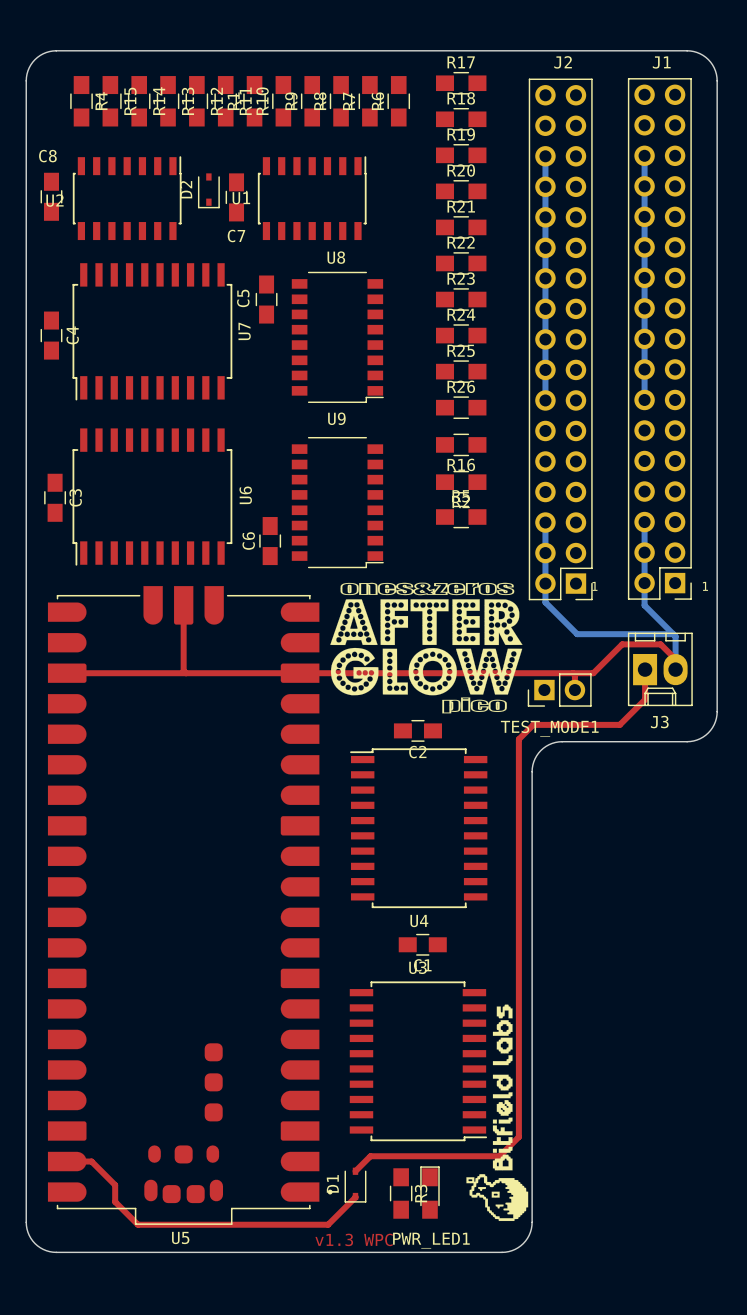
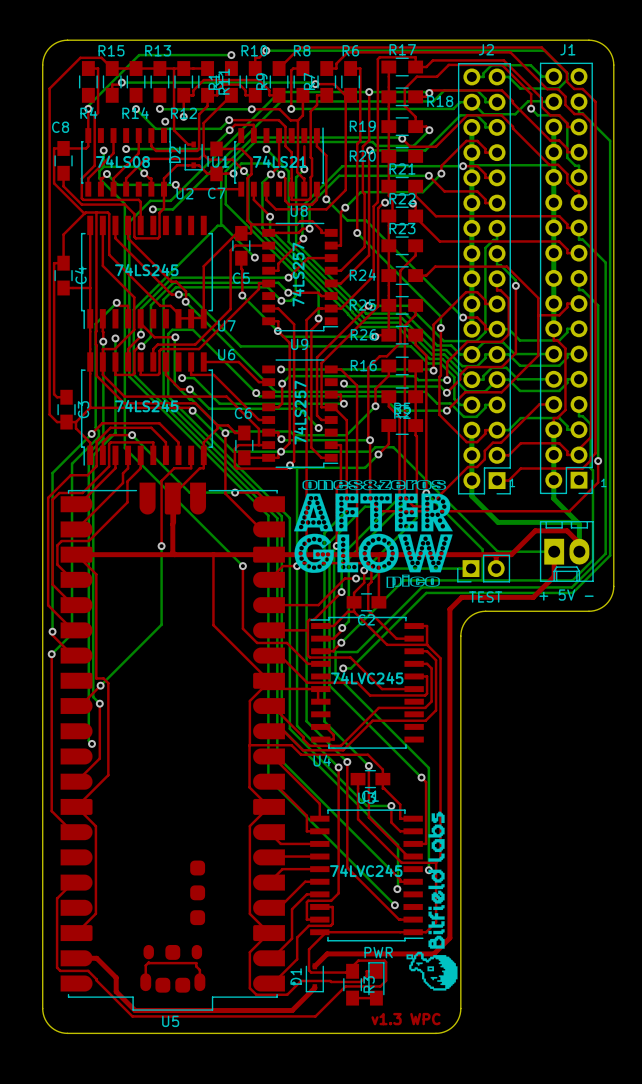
top track: none -> (266, 50) (259, 57) (255, 57) (255, 68)
bottom track: none -> (266, 50) (544, 50) (567, 73) (567, 79) (558, 88) (520, 88) (508, 76) (497, 76)
via: none -> (266, 50)
bottom track: none -> (231, 55) (139, 55) (88, 105) (88, 108)
via: none -> (231, 55)
top track: none -> (388, 67) (388, 195) (392, 199) (392, 212) (388, 216) (388, 335) (375, 336)
top track: none -> (88, 68) (98, 68) (98, 113) (94, 116) (94, 165) (81, 178) (81, 198) (83, 199) (138, 199) (140, 201) (140, 225)
top track: none -> (174, 68) (174, 130) (188, 144) (193, 144)
top track: none -> (207, 68) (112, 68) (101, 57) (80, 57) (49, 88) (49, 414) (57, 422) (75, 422)
top track: none -> (279, 68) (300, 47) (541, 47) (566, 72) (566, 81) (574, 88) (582, 88) (595, 101) (595, 453) (582, 468) (520, 468) (508, 480) (497, 480)
top track: none -> (302, 68) (293, 68) (291, 70) (291, 108)
top track: none -> (326, 68) (336, 68) (336, 63) (347, 52) (510, 52) (547, 89) (558, 89) (565, 96) (565, 104) (574, 114) (582, 114) (591, 122) (591, 437) (573, 454)
top track: none -> (350, 68) (360, 68) (360, 140) (357, 143) (357, 233)
bottom track: none -> (553, 76) (542, 76) (530, 65) (491, 65) (483, 73) (483, 76) (471, 76)
R18 name position: R18 (461, 98) -> R18 (440, 101)
R4 name rotation: 0° (101, 101) -> 90° clockwise (88, 113)
R4 name position: R4 (101, 101) -> R4 (88, 113)
R15 name rotation: 0° (130, 101) -> 90° clockwise (111, 50)
R15 name position: R15 (130, 101) -> R15 (111, 50)
R14 name rotation: 0° (159, 101) -> 90° clockwise (135, 113)
R14 name position: R14 (159, 101) -> R14 (135, 113)
R13 name rotation: 0° (188, 101) -> 90° clockwise (158, 50)
R13 name position: R13 (188, 101) -> R13 (158, 50)
R12 name rotation: 0° (216, 101) -> 90° clockwise (183, 113)
R12 name position: R12 (216, 101) -> R12 (183, 113)
R10 name rotation: 0° (262, 101) -> 90° clockwise (254, 50)
R8 name rotation: 0° (320, 101) -> 90° clockwise (302, 50)
R8 name position: R8 (320, 101) -> R8 (302, 50)
R6 name rotation: 0° (377, 101) -> 90° clockwise (350, 50)
R6 name position: R6 (377, 101) -> R6 (350, 50)
top track: none -> (121, 82) (119, 84) (112, 84) (112, 95)
bottom track: none -> (121, 82) (313, 82) (315, 84)
via: none -> (121, 82)
top track: none -> (315, 84) (334, 84) (345, 95)
via: none -> (315, 84)
top track: none -> (369, 92) (369, 140) (362, 146) (364, 247) (340, 270) (331, 270)
via: none -> (369, 92)
bottom track: none -> (429, 93) (279, 92) (170, 200) (150, 200) (129, 221) (129, 376) (268, 515) (268, 778) (394, 905)
via: none -> (429, 93)
top track: none -> (231, 95) (203, 123) (203, 154)
top track: none -> (255, 95) (245, 95) (245, 90) (239, 84) (223, 84) (217, 90) (217, 95) (207, 95) (207, 106) (199, 114) (199, 148) (197, 150) (156, 150) (151, 146) (151, 135)
top track: none -> (279, 95) (269, 95) (269, 90) (258, 80) (203, 80) (193, 90) (193, 95) (183, 95) (183, 116)
top track: none -> (302, 95) (302, 115) (297, 120)
top track: none -> (326, 95) (317, 95) (317, 105) (310, 111) (312, 176) (309, 199) (291, 199) (291, 152) (285, 146) (285, 126) (278, 120) (229, 120)
top track: none -> (350, 95) (345, 95) (345, 190) (326, 209) (275, 209) (266, 199) (266, 189)
top track: none -> (415, 96) (426, 96) (431, 90) (501, 90) (550, 140) (559, 140) (567, 148) (567, 152) (579, 152)
bottom track: none -> (497, 102) (485, 102) (485, 98) (477, 90) (444, 90) (433, 101) (280, 101) (172, 209) (152, 209)
bottom track: none -> (553, 101) (528, 101) (515, 114) (483, 114) (471, 102) (460, 102) (453, 108) (291, 108)
bottom track: none -> (579, 101) (579, 113) (582, 113) (610, 140) (610, 555) (572, 592) (426, 592) (350, 668) (343, 668)
top track: none -> (88, 106) (88, 146) (86, 148) (54, 148) (54, 183) (84, 213)
via: none -> (88, 108)
bottom track: none -> (159, 108) (251, 109)
via: none -> (159, 108)
via: none -> (291, 108)
top track: none -> (531, 108) (531, 94) (501, 64) (448, 64) (437, 76) (416, 76) (404, 88) (404, 106) (415, 116) (415, 126) (426, 126) (429, 130)
bottom track: none -> (531, 108) (537, 115) (559, 115) (567, 123) (567, 157) (575, 165) (579, 165) (579, 177)
via: none -> (531, 108)
bottom track: none -> (136, 109) (155, 128) (220, 128) (229, 120)
via: none -> (136, 109)
top track: none -> (251, 109) (279, 109) (290, 120) (297, 120)
via: none -> (251, 109)
R19 name position: R19 (461, 134) -> R19 (362, 126)
via: none -> (183, 116)
via: none -> (229, 120)
top track: none -> (297, 120) (297, 172) (304, 178) (304, 189)
via: none -> (165, 121)
top track: none -> (579, 127) (567, 127) (567, 123) (559, 115) (550, 115) (541, 106) (541, 98) (503, 60) (432, 60) (426, 67) (415, 67) (415, 57) (379, 57) (377, 59) (377, 202) (373, 206) (373, 275) (340, 308) (318, 308) (306, 320) (306, 546)
bottom track: none -> (497, 127) (485, 127) (485, 123) (476, 115) (460, 115) (425, 150) (370, 150)
top track: none -> (229, 130) (235, 124) (253, 124) (253, 135)
bottom track: none -> (229, 130) (210, 149) (126, 149)
via: none -> (229, 130)
bottom track: none -> (429, 130) (413, 145) (376, 145) (372, 142) (254, 142) (225, 171) (225, 204) (295, 274) (295, 295) (290, 300) (281, 300) (267, 287) (175, 287) (163, 299) (163, 398) (281, 516) (281, 728) (398, 844) (397, 889)
via: none -> (429, 130)
top track: none -> (113, 135) (113, 153) (88, 178) (88, 189)
top track: none -> (138, 135) (138, 153) (113, 178) (113, 189)
top track: none -> (279, 135) (279, 166) (270, 174)
top track: none -> (316, 135) (316, 146) (326, 155) (326, 199)
top track: none -> (402, 138) (410, 146) (435, 146) (467, 115) (501, 115) (549, 164) (558, 164) (567, 174) (567, 182) (575, 191) (579, 191) (579, 202)
bottom track: none -> (402, 138) (253, 137) (221, 169) (221, 225)
via: none -> (402, 138)
R20 name position: R20 (461, 170) -> R20 (362, 156)
top track: none -> (304, 146) (304, 169)
via: none -> (126, 149)
top track: none -> (216, 148) (241, 148) (251, 159) (251, 174) (247, 178) (247, 220) (251, 224)
bottom track: none -> (266, 149) (288, 171) (288, 241) (364, 318) (401, 318) (433, 350) (446, 350) (462, 366) (477, 366) (485, 358) (485, 354) (508, 354) (520, 365) (559, 365) (567, 357) (567, 354) (579, 354)
via: none -> (266, 149)
bottom track: none -> (103, 150) (103, 166)
via: none -> (103, 150)
top track: none -> (370, 150) (369, 255) (340, 283) (331, 283)
via: none -> (370, 150)
top track: none -> (497, 152) (485, 152) (485, 148) (477, 140) (466, 140) (441, 165) (441, 173)
top track: none -> (203, 154) (208, 159) (232, 159) (243, 171)
top track: none -> (203, 154) (199, 158) (145, 158) (126, 178) (126, 189)
text: none -> 74LS08 (122, 161)
text: none -> 74LS21 (279, 161)
U2 name position: U2 (54, 200) -> U2 (184, 193)
bottom track: none -> (471, 165) (553, 165)
top track: none -> (463, 166) (477, 166) (485, 174) (485, 177) (497, 177)
bottom track: none -> (463, 166) (342, 166) (302, 206) (303, 238)
via: none -> (463, 166)
bottom track: none -> (103, 166) (137, 166) (144, 173)
bottom track: none -> (103, 166) (99, 171) (99, 178) (124, 203) (124, 448) (242, 566)
bottom track: none -> (304, 169) (296, 177) (296, 242) (366, 313) (405, 313) (437, 345) (451, 345) (460, 354) (471, 354) (483, 342) (503, 342) (514, 354) (553, 354)
via: none -> (304, 169)
bottom track: none -> (243, 171) (248, 175) (248, 220) (318, 290) (318, 318)
via: none -> (243, 171)
top track: none -> (63, 173) (63, 186) (81, 204) (124, 204) (134, 214) (135, 238) (159, 236) (159, 212) (163, 208) (163, 178) (177, 165) (199, 165) (207, 173) (233, 173)
top track: none -> (144, 173) (151, 178) (151, 189)
via: none -> (144, 173)
top track: none -> (106, 174) (100, 178) (100, 189)
bottom track: none -> (106, 174) (117, 184) (175, 184)
via: none -> (106, 174)
bottom track: none -> (233, 173) (241, 163) (270, 163) (281, 174)
via: none -> (233, 173)
bottom track: none -> (441, 173) (422, 192) (360, 192) (345, 207)
via: none -> (441, 173)
bottom track: none -> (270, 174) (262, 182) (262, 228) (360, 327) (397, 327) (429, 358) (442, 358) (458, 375) (458, 383) (466, 391) (485, 391) (497, 379) (508, 379) (520, 390) (559, 390) (567, 382) (567, 379) (579, 379)
via: none -> (270, 174)
top track: none -> (281, 174) (285, 178) (285, 200) (288, 204) (312, 204) (316, 199) (316, 189)
via: none -> (281, 174)
top track: none -> (428, 175) (444, 191) (477, 191) (485, 199) (485, 203) (497, 203)
bottom track: none -> (428, 175) (339, 175) (309, 205) (309, 228)
via: none -> (428, 175)
top track: none -> (175, 184) (180, 189) (241, 189)
via: none -> (175, 184)
top track: none -> (415, 186) (415, 195) (435, 216) (559, 216) (567, 224) (567, 227) (579, 227)
top track: none -> (253, 189) (253, 199) (270, 216)
bottom track: none -> (326, 199) (347, 220) (365, 220) (463, 317)
via: none -> (326, 199)
top track: none -> (385, 202) (378, 208) (378, 306) (321, 363) (321, 407) (333, 407) (346, 420) (346, 510)
via: none -> (385, 202)
top track: none -> (412, 203) (415, 206) (415, 217) (439, 241) (559, 241) (567, 249) (567, 253) (579, 253)
via: none -> (412, 203)
top track: none -> (345, 207) (340, 212) (340, 245) (331, 245)
via: none -> (345, 207)
via: none -> (152, 209)
top track: none -> (96, 212) (96, 375) (124, 403) (195, 403) (217, 425) (217, 428) (203, 442) (203, 468) (199, 468) (174, 493) (174, 522) (172, 524)
bottom track: none -> (270, 216) (270, 229) (362, 322) (400, 322) (432, 354) (444, 354) (469, 379) (483, 379) (483, 376) (491, 367) (506, 367) (517, 379) (553, 379)
via: none -> (270, 216)
top track: none -> (251, 224) (250, 233) (236, 233) (203, 266) (203, 318)
top track: none -> (251, 224) (297, 224) (300, 221) (312, 221) (321, 232) (331, 232)
top track: none -> (90, 225) (90, 407)
top track: none -> (102, 225) (102, 265) (134, 297) (134, 329) (115, 349) (102, 349) (102, 374) (124, 396) (226, 396) (258, 428) (258, 445)
top track: none -> (115, 225) (115, 238) (171, 294) (178, 294)
top track: none -> (128, 225) (128, 238) (171, 281) (176, 281) (186, 291) (185, 301)
bottom track: none -> (579, 227) (579, 239) (582, 239) (605, 262) (605, 553) (571, 587) (421, 587) (357, 652) (335, 652)
top track: none -> (309, 228) (302, 228) (298, 232) (268, 232)
via: none -> (309, 228)
bottom track: none -> (497, 228) (497, 239) (493, 239) (485, 248) (485, 332) (476, 341) (443, 341) (408, 305) (368, 305)
bottom track: none -> (357, 233) (440, 316) (440, 327)
via: none -> (357, 233)
top track: none -> (303, 238) (278, 263) (278, 270) (268, 270)
via: none -> (303, 238)
C5 name rotation: 0° (243, 298) -> 90° clockwise (241, 278)
C5 name position: C5 (243, 298) -> C5 (241, 278)
top track: none -> (268, 245) (235, 245) (230, 250) (230, 309) (195, 344) (157, 344) (153, 349) (153, 361)
top track: none -> (415, 245) (415, 255) (400, 270) (400, 342) (386, 356) (379, 356) (368, 367) (370, 500) (380, 511) (569, 511) (598, 482) (598, 461)
bottom track: none -> (497, 253) (497, 265) (500, 265) (515, 280) (515, 285)
bottom track: none -> (254, 257) (223, 225) (217, 225) (133, 309) (133, 374) (277, 518) (277, 756) (390, 870)
via: none -> (254, 257)
top track: none -> (241, 258) (242, 295)
top track: none -> (331, 258) (308, 258) (288, 277)
R24 name position: R24 (461, 314) -> R24 (362, 274)
text: none -> 74LS245 (146, 270)
U7 name rotation: 0° (244, 331) -> 90° clockwise (226, 325)
U7 name position: U7 (244, 331) -> U7 (226, 325)
text: none -> 74LS257 (298, 274)
top track: none -> (415, 275) (426, 275) (435, 266) (506, 266) (538, 298) (538, 355) (501, 392) (465, 392) (446, 410)
bottom track: none -> (288, 277) (172, 277) (141, 308) (141, 334)
via: none -> (288, 277)
bottom track: none -> (579, 278) (579, 290) (582, 290) (598, 305) (598, 461)
top track: none -> (497, 278) (497, 290) (500, 290) (508, 298) (508, 334) (501, 341) (467, 341) (447, 362) (447, 380)
top track: none -> (268, 283) (258, 283) (258, 289) (198, 349) (161, 349) (159, 350) (158, 374) (140, 374) (140, 361)
top track: none -> (515, 285) (515, 353) (501, 367) (467, 367) (460, 374) (460, 379) (446, 392)
via: none -> (515, 285)
top track: none -> (63, 288) (90, 288)
R25 name position: R25 (461, 350) -> R25 (362, 305)
top track: none -> (288, 292) (318, 292) (321, 296) (331, 296)
bottom track: none -> (288, 292) (278, 282) (173, 282) (150, 305) (150, 336) (141, 346)
via: none -> (288, 292)
bottom track: none -> (178, 294) (188, 294) (240, 346) (410, 346) (428, 363) (440, 363) (454, 377) (454, 399) (460, 404) (471, 404)
via: none -> (178, 294)
bottom track: none -> (242, 295) (283, 336) (375, 336)
via: none -> (242, 295)
via: none -> (281, 300)
bottom track: none -> (185, 301) (275, 391) (425, 391) (437, 403) (450, 403) (463, 416) (476, 416) (485, 407) (485, 404) (497, 404)
via: none -> (185, 301)
top track: none -> (116, 302) (119, 305) (128, 305) (128, 318)
bottom track: none -> (116, 302) (95, 323) (95, 427) (98, 430) (98, 436) (72, 463) (72, 633) (51, 654)
via: none -> (116, 302)
top track: none -> (497, 303) (485, 303) (485, 300) (477, 292) (466, 292) (433, 324) (433, 370)
top track: none -> (579, 303) (567, 303) (567, 307) (559, 315) (538, 315)
top track: none -> (415, 305) (415, 315) (404, 325) (404, 497) (413, 506) (428, 506) (468, 467) (477, 467) (484, 459) (484, 450) (492, 442) (501, 442) (539, 404) (553, 404)
top track: none -> (368, 305) (317, 357) (317, 415) (321, 419) (331, 419)
via: none -> (368, 305)
top track: none -> (268, 308) (278, 308) (294, 324) (294, 461) (286, 468) (236, 468) (234, 466) (234, 448) (238, 445) (268, 445)
top track: none -> (203, 317) (191, 318)
R26 name position: R26 (461, 386) -> R26 (363, 334)
top track: none -> (463, 317) (477, 317) (485, 325) (485, 329) (497, 329)
via: none -> (463, 317)
top track: none -> (102, 318) (103, 341)
top track: none -> (140, 318) (140, 323) (154, 337) (175, 337)
top track: none -> (178, 318) (191, 318)
top track: none -> (178, 318) (178, 313) (170, 305) (160, 305) (109, 254) (109, 213) (85, 212) (63, 234) (63, 263) (54, 263) (54, 394) (57, 397) (66, 397)
top track: none -> (318, 318) (320, 321) (311, 329) (311, 447) (321, 457) (331, 457)
via: none -> (318, 318)
top track: none -> (268, 321) (278, 321) (277, 331) (289, 342) (289, 443) (278, 454) (278, 457) (244, 457)
top track: none -> (440, 327) (439, 414) (466, 442) (477, 442) (485, 433) (485, 430) (497, 430)
via: none -> (440, 327)
top track: none -> (553, 328) (553, 340) (557, 340) (565, 348) (565, 410) (557, 418) (553, 418) (553, 429)
bottom track: none -> (579, 328) (567, 328) (567, 332) (559, 340) (520, 340) (508, 329) (497, 329)
via: none -> (277, 331)
top track: none -> (141, 334) (128, 349) (128, 361)
via: none -> (141, 334)
top track: none -> (415, 335) (415, 344) (426, 355) (426, 493)
via: none -> (375, 336)
bottom track: none -> (175, 337) (174, 384) (225, 433) (227, 431) (290, 431) (294, 435) (346, 435) (375, 406)
via: none -> (175, 337)
bottom track: none -> (115, 338) (115, 433) (93, 455) (93, 697) (99, 703)
via: none -> (115, 338)
bottom track: none -> (103, 341) (103, 438) (88, 453) (88, 740) (91, 743)
via: none -> (103, 341)
top track: none -> (141, 346) (134, 350) (133, 374) (115, 374) (115, 361)
via: none -> (141, 346)
top track: none -> (165, 361) (165, 374) (180, 389) (189, 389)
top track: none -> (191, 361) (191, 374) (213, 374) (258, 419) (268, 419)
top track: none -> (203, 361) (238, 361) (258, 382) (268, 382)
top track: none -> (388, 365) (388, 375) (375, 388) (375, 406)
top track: none -> (415, 365) (416, 498)
bottom track: none -> (281, 369) (433, 370)
via: none -> (281, 369)
top track: none -> (331, 369) (340, 369) (357, 385) (357, 554)
via: none -> (433, 370)
bottom track: none -> (182, 378) (194, 378) (219, 403) (343, 403)
via: none -> (182, 378)
bottom track: none -> (447, 380) (418, 380) (414, 376) (289, 376) (282, 383)
via: none -> (447, 380)
R16 name position: R16 (461, 464) -> R16 (363, 365)
top track: none -> (282, 383) (282, 403) (278, 407) (268, 407)
via: none -> (282, 383)
bottom track: none -> (344, 383) (346, 386) (440, 386) (446, 392)
via: none -> (344, 383)
bottom track: none -> (189, 389) (209, 408) (299, 408) (318, 427)
via: none -> (189, 389)
via: none -> (256, 393)
via: none -> (446, 392)
top track: none -> (331, 394) (340, 394) (340, 400) (343, 403)
top track: none -> (388, 396) (388, 406) (399, 417) (399, 497) (396, 500)
via: none -> (343, 403)
bottom track: none -> (579, 404) (579, 416) (582, 416) (590, 424) (590, 468) (592, 470) (592, 560) (572, 580) (403, 580) (341, 642)
text: none -> 74LS245 (146, 406)
via: none -> (375, 406)
top track: none -> (90, 407) (75, 422)
top track: none -> (90, 407) (189, 407) (192, 410)
U6 name rotation: 0° (245, 495) -> 90° clockwise (226, 354)
U6 name position: U6 (245, 495) -> U6 (226, 354)
bottom track: none -> (192, 410) (233, 451) (371, 451) (375, 447) (393, 447) (497, 551) (554, 551)
via: none -> (192, 410)
bottom track: none -> (446, 410) (397, 410) (382, 396) (259, 396) (192, 329) (172, 329) (168, 334) (168, 396) (289, 518) (289, 728) (366, 805) (391, 805)
via: none -> (446, 410)
text: none -> 74LS257 (300, 412)
top track: none -> (75, 422) (75, 428) (90, 442) (90, 455)
top track: none -> (217, 425) (228, 425) (234, 433) (244, 433)
top track: none -> (388, 425) (388, 444) (378, 454)
via: none -> (318, 427)
bottom track: none -> (579, 429) (567, 429) (567, 426) (559, 418) (520, 418) (508, 430) (497, 430)
top track: none -> (268, 432) (278, 432) (281, 439)
top track: none -> (225, 433) (225, 493) (261, 529) (269, 529)
via: none -> (225, 433)
top track: none -> (91, 433) (102, 423) (159, 423) (178, 442) (178, 455)
bottom track: none -> (91, 433) (52, 473) (52, 631)
via: none -> (91, 433)
top track: none -> (132, 435) (110, 435) (102, 442) (102, 455)
bottom track: none -> (132, 435) (189, 492) (235, 492)
via: none -> (132, 435)
bottom track: none -> (281, 439) (370, 440)
via: none -> (281, 439)
via: none -> (370, 440)
top track: none -> (331, 445) (340, 445) (340, 484) (336, 488) (336, 545)
C6 name rotation: 0° (248, 541) -> 90° clockwise (243, 413)
C6 name position: C6 (248, 541) -> C6 (243, 413)
via: none -> (281, 451)
bottom track: none -> (378, 454) (365, 467) (292, 467) (290, 465)
via: none -> (378, 454)
top track: none -> (579, 454) (567, 454) (567, 451) (559, 443) (520, 443) (508, 455) (497, 455)
top track: none -> (115, 455) (115, 468) (79, 504) (76, 504)
top track: none -> (128, 455) (128, 468) (123, 473) (123, 483) (76, 529)
top track: none -> (140, 455) (140, 468) (127, 481) (127, 502) (88, 541) (61, 541) (57, 545) (57, 564) (72, 579) (76, 579)
top track: none -> (153, 455) (153, 442) (110, 442) (109, 466) (82, 492) (59, 492) (52, 499) (52, 584) (73, 605) (76, 605)
top track: none -> (165, 455) (165, 442) (151, 427) (110, 427) (96, 441) (96, 466) (87, 475) (70, 475) (48, 497) (48, 605) (73, 630) (76, 630)
top track: none -> (191, 455) (191, 468) (174, 468) (161, 480) (161, 546)
via: none -> (598, 461)
via: none -> (290, 465)
bottom track: none -> (297, 467) (297, 725) (338, 767)
top track: none -> (235, 492) (257, 492) (269, 504)
via: none -> (235, 492)
bottom track: none -> (426, 493) (482, 549) (482, 580)
via: none -> (426, 493)
bottom track: none -> (416, 498) (416, 517) (364, 570)
bottom track: none -> (406, 499) (348, 558) (348, 621) (342, 627)
bottom track: none -> (396, 500) (341, 555) (341, 592)
bottom track: none -> (376, 506) (365, 506) (329, 542) (329, 685) (421, 777)
bottom track: none -> (346, 510) (324, 533) (324, 721) (368, 765)
bottom track: none -> (161, 546) (161, 624) (100, 685)
via: none -> (161, 546)
bottom track: none -> (306, 546) (306, 721) (347, 761)
bottom track: none -> (336, 545) (334, 548) (335, 652)
via: none -> (336, 545)
top track: none -> (76, 554) (96, 574) (96, 678) (103, 678) (108, 683) (108, 775) (76, 806) (95, 826) (95, 913) (76, 933)
top track: none -> (213, 554) (213, 625) (269, 680) (269, 688)
top track: none -> (380, 554) (378, 602)
top track: none -> (242, 566) (242, 628) (257, 642) (286, 642) (307, 663) (320, 663)
via: none -> (242, 566)
via: none -> (297, 566)
bottom track: none -> (471, 568) (383, 568) (373, 578) (356, 578)
top track: none -> (364, 570) (364, 582) (354, 592) (354, 611)
via: none -> (364, 570)
top track: none -> (356, 578) (344, 578) (318, 605) (269, 605)
via: none -> (356, 578)
top track: none -> (269, 579) (282, 566) (297, 566) (300, 563) (367, 563) (371, 567) (371, 582) (368, 585) (368, 610) (396, 638) (414, 638)
top track: none -> (341, 592) (313, 619) (307, 621) (307, 655) (309, 657) (350, 657) (382, 689) (414, 689)
via: none -> (341, 592)
J3 name: J3 (659, 722) -> + 5V - (566, 595)
TEST_MODE1 name: TEST_MODE1 (549, 728) -> TEST (485, 597)
top track: none -> (354, 611) (347, 611) (333, 626) (320, 626)
top track: none -> (354, 611) (387, 644) (427, 644)
top track: none -> (414, 626) (427, 626) (427, 644)
top track: none -> (342, 627) (333, 638) (320, 638)
via: none -> (342, 627)
top track: none -> (269, 630) (307, 630)
top track: none -> (52, 631) (52, 635) (72, 655) (76, 655)
via: none -> (52, 631)
top track: none -> (341, 642) (333, 651) (320, 651)
via: none -> (341, 642)
top track: none -> (427, 644) (440, 658) (440, 858) (436, 862)
top track: none -> (414, 651) (427, 651) (436, 660) (436, 710) (425, 720) (372, 720) (343, 750) (302, 750) (283, 731) (269, 731)
bottom track: none -> (335, 652) (335, 674) (428, 768) (428, 870)
top track: none -> (51, 654) (51, 811) (72, 832) (76, 832)
via: none -> (51, 654)
top track: none -> (269, 655) (280, 655) (307, 682) (357, 682) (370, 695) (425, 695) (427, 693) (427, 676) (414, 676)
top track: none -> (414, 663) (427, 663) (431, 668) (431, 701) (425, 707) (378, 707) (340, 745) (309, 745) (272, 706) (269, 706)
via: none -> (343, 668)
text: none -> 74LVC245 (367, 678)
top track: none -> (100, 685) (80, 706) (76, 706)
via: none -> (100, 685)
top track: none -> (318, 689) (318, 701)
top track: none -> (320, 689) (261, 688) (249, 700) (249, 745)
top track: none -> (99, 703) (99, 758) (76, 781)
via: none -> (99, 703)
top track: none -> (325, 726) (333, 734) (333, 739) (320, 739)
via: none -> (91, 743)
top track: none -> (249, 745) (249, 787) (269, 806) (249, 826) (249, 913) (269, 933) (249, 952) (249, 988) (256, 994) (287, 994) (301, 980) (360, 981) (366, 976) (366, 971) (376, 971)
top track: none -> (249, 745) (291, 745) (301, 754) (367, 754) (382, 769) (382, 788) (400, 804) (400, 818) (413, 818)
top track: none -> (269, 756) (272, 756) (319, 803) (319, 818)
U4 name position: U4 (419, 921) -> U4 (322, 760)
top track: none -> (347, 761) (347, 867) (399, 919) (413, 919)
via: none -> (347, 761)
top track: none -> (368, 765) (368, 817) (408, 856) (413, 856)
via: none -> (368, 765)
top track: none -> (338, 767) (338, 893) (331, 900) (306, 902) (306, 919) (319, 919)
via: none -> (338, 767)
top track: none -> (421, 777) (426, 782) (426, 843) (413, 843)
via: none -> (421, 777)
top track: none -> (358, 779) (358, 819) (401, 862) (436, 862)
top track: none -> (269, 781) (272, 781) (306, 815) (306, 831) (319, 831)
top track: none -> (391, 805) (391, 822) (400, 831) (413, 831)
via: none -> (391, 805)
top track: none -> (269, 832) (280, 843) (319, 843)
top track: none -> (319, 856) (269, 857)
top track: none -> (436, 862) (436, 922) (426, 932) (319, 932)
top track: none -> (319, 869) (282, 869) (269, 882)
top track: none -> (390, 870) (400, 881) (413, 881)
via: none -> (428, 870)
text: none -> 74LVC245 (366, 870)
top track: none -> (319, 881) (305, 881) (279, 907) (269, 907)
top track: none -> (76, 882) (73, 882) (57, 898) (57, 967) (60, 970) (88, 970) (132, 1016) (315, 1016) (345, 986) (380, 986) (386, 980) (384, 960) (358, 960) (346, 972) (311, 972) (309, 970) (309, 949) (326, 932)
via: none -> (397, 889)
top track: none -> (319, 894) (306, 894) (292, 909) (292, 938) (272, 958) (269, 958)
via: none -> (394, 905)
top track: none -> (319, 906) (332, 906) (332, 923) (330, 925) (308, 925) (297, 937) (297, 959) (272, 983) (269, 983)
drawing position: (497, 1112) -> (432, 901)
top track: none -> (145, 982) (145, 965) (148, 962) (196, 963) (196, 966) (199, 970) (199, 982)
top track: none -> (352, 998) (376, 998)
text position: v1.3 WPC (354, 1239) -> v1.3 WPC (405, 1019)
PWR_LED1 name: PWR_LED1 (431, 1240) -> PWR (378, 952)

